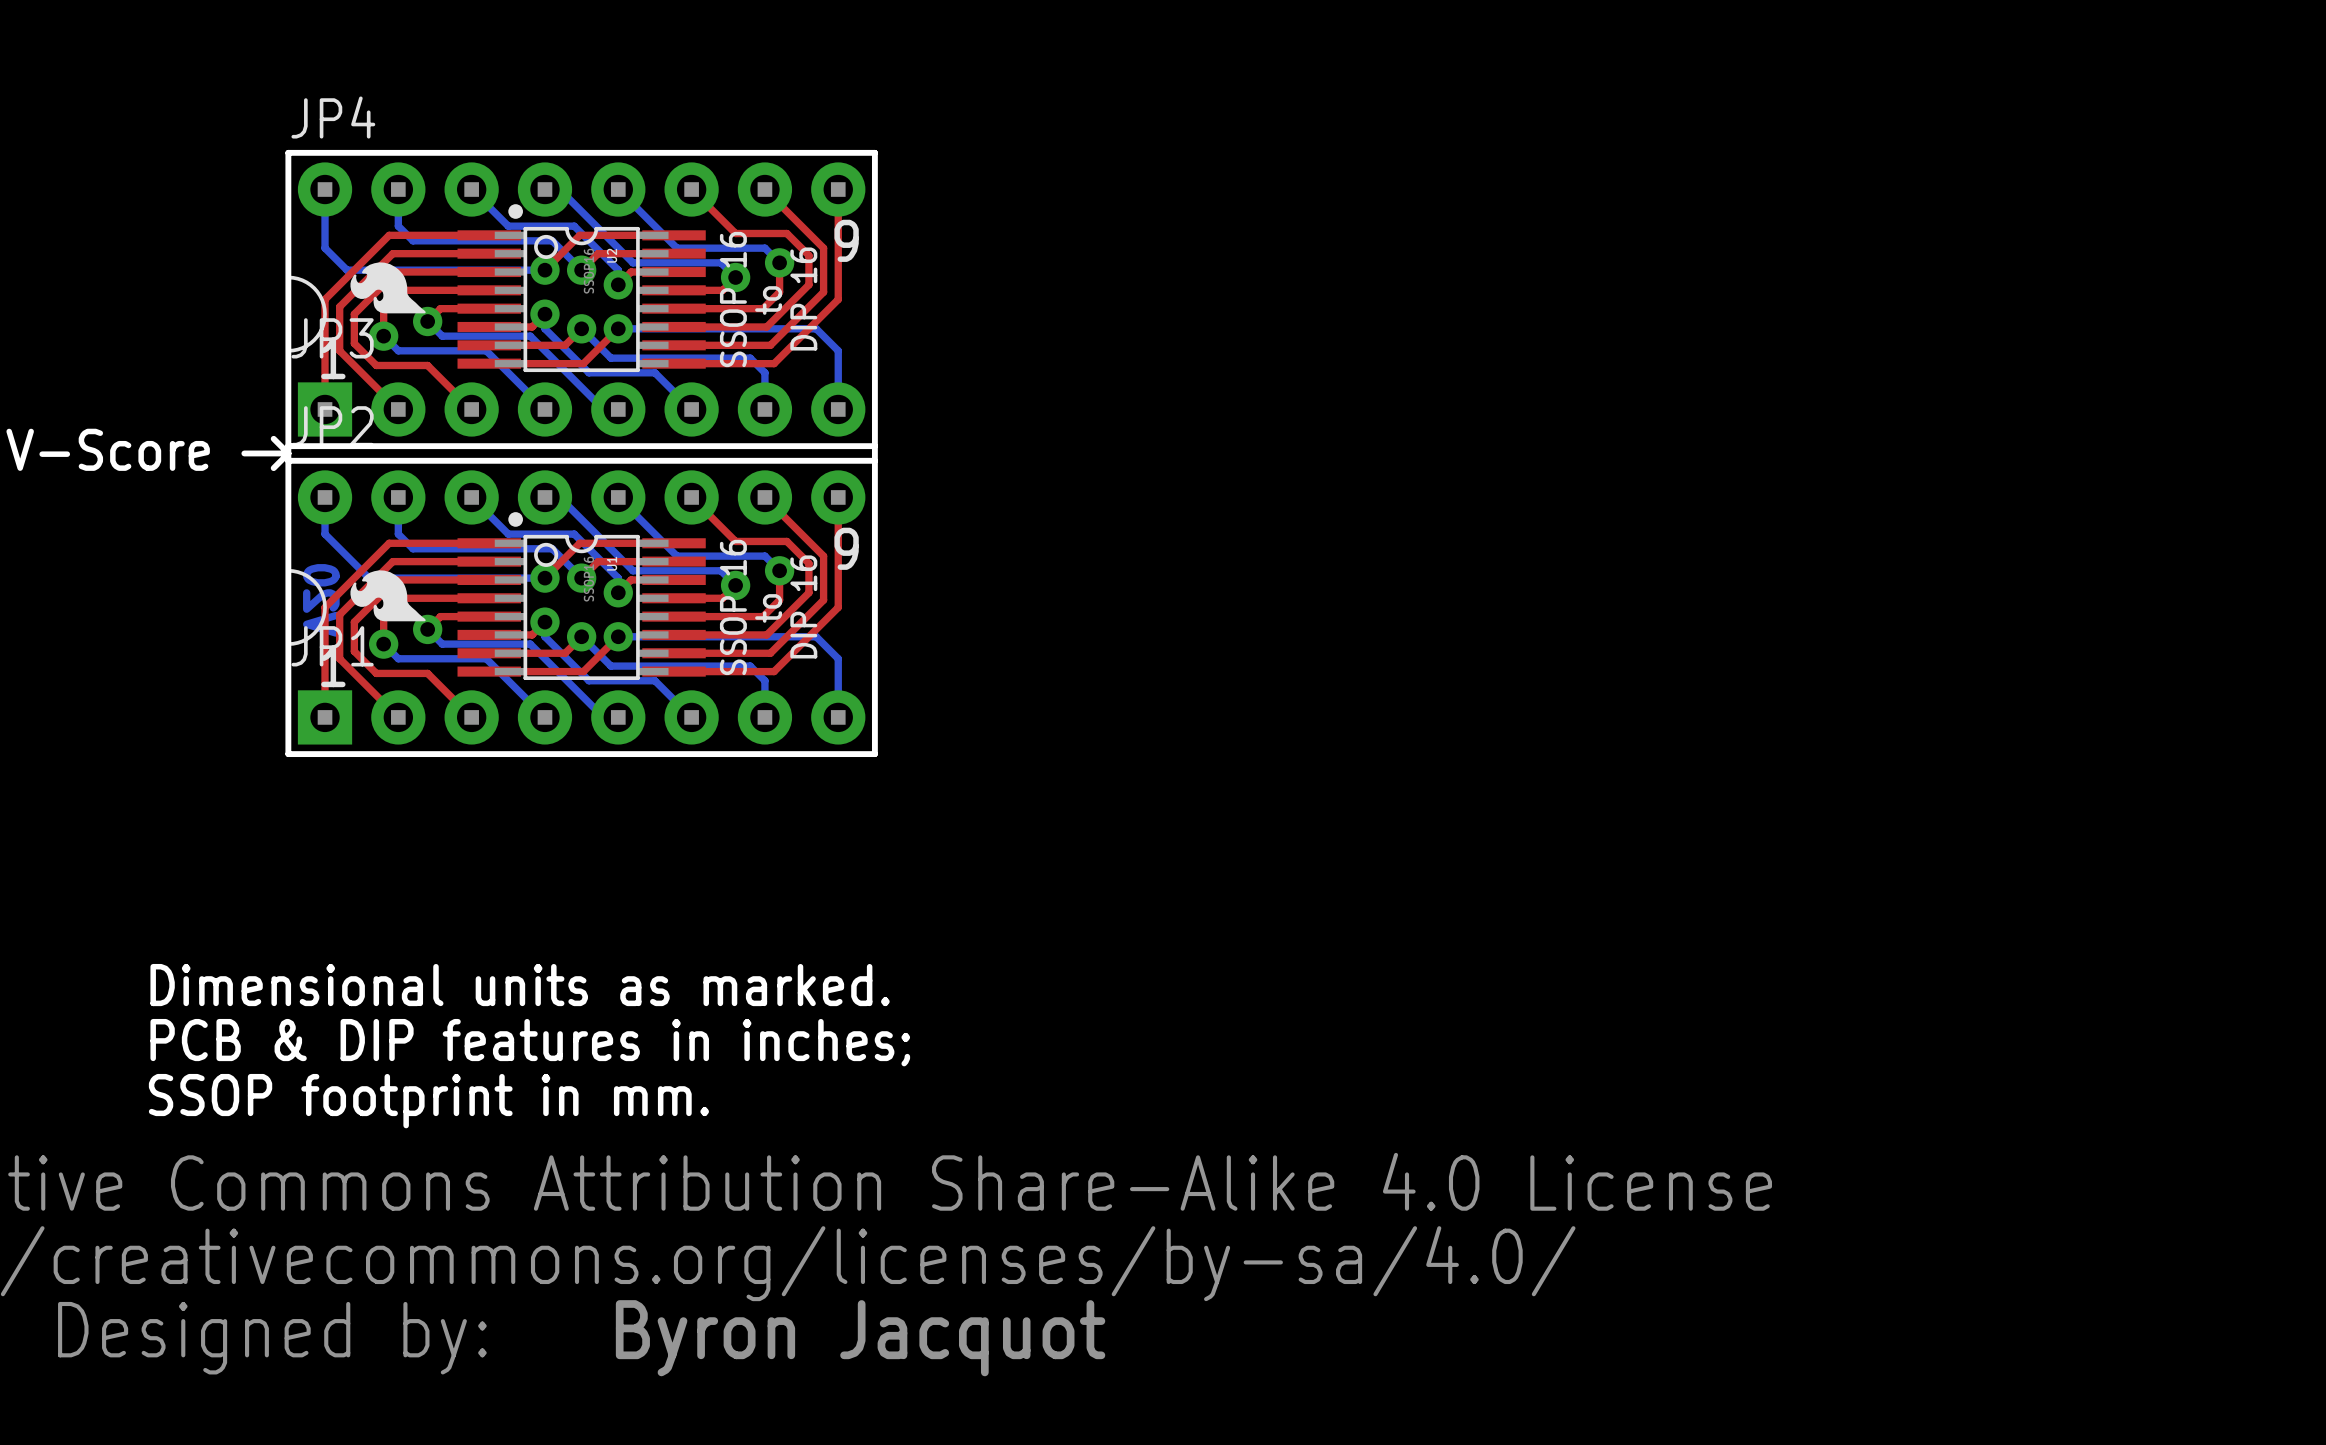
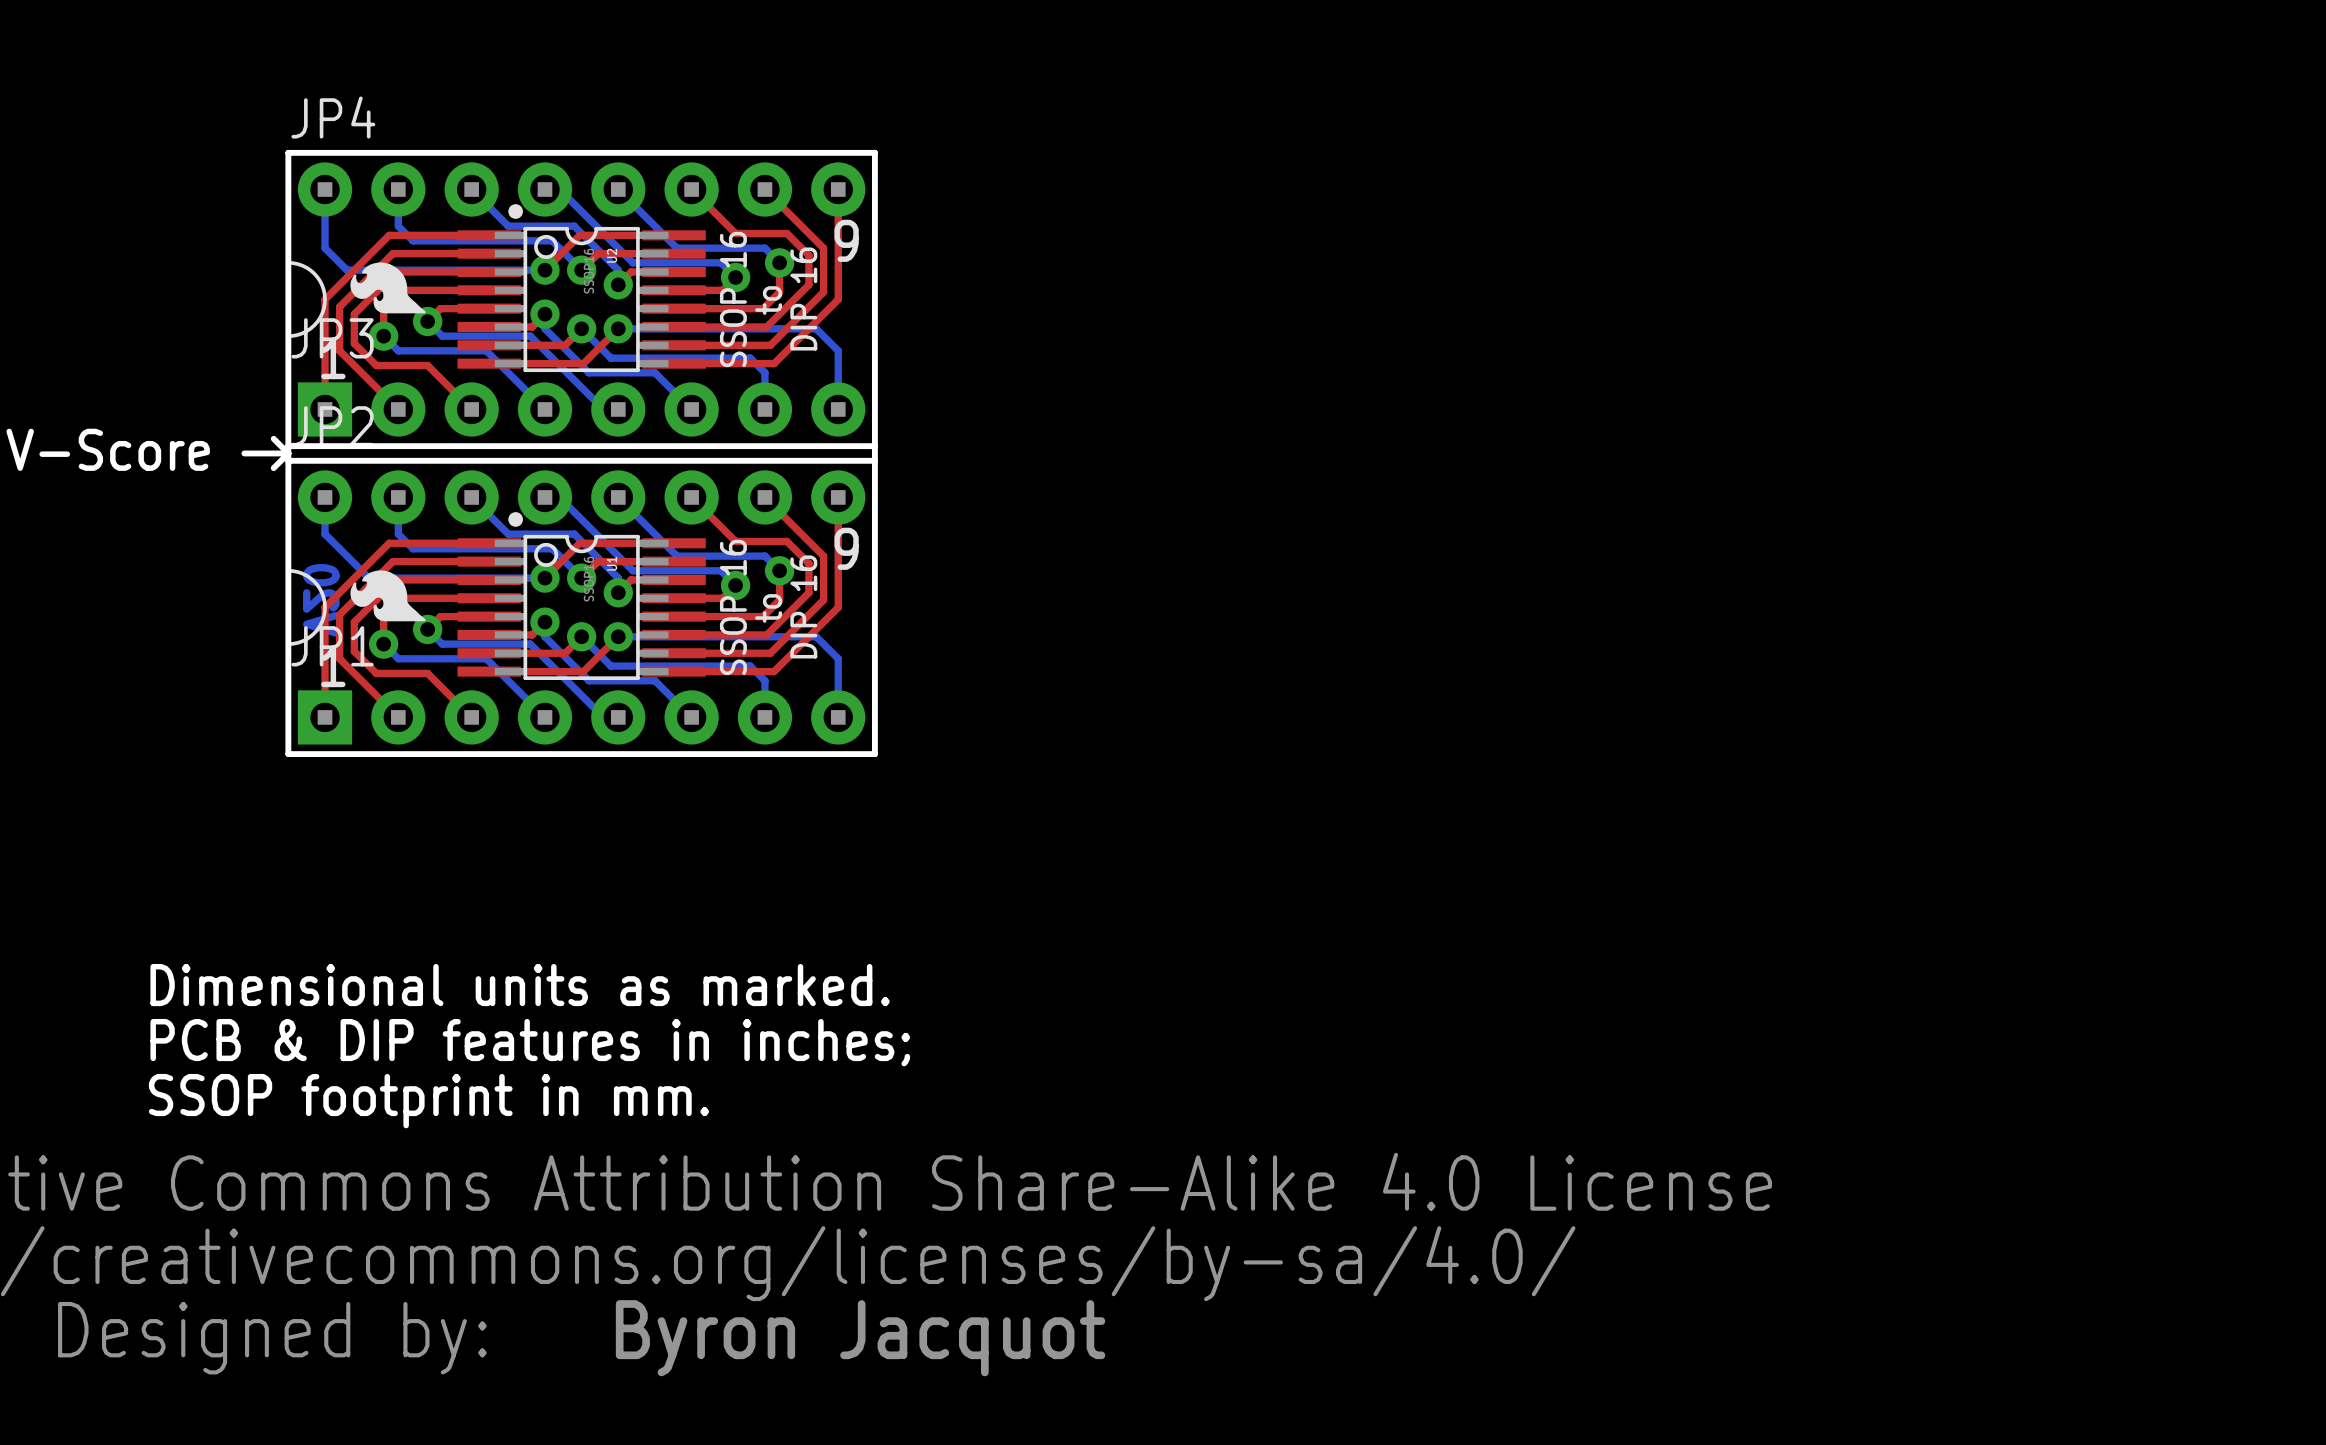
line: (288, 277) (302, 280) (314, 288) (322, 300) (325, 314) (322, 328) (314, 340) (302, 348) (288, 350) -> (288, 262) (302, 265) (314, 273) (322, 285) (325, 299) (322, 313) (314, 325) (302, 333) (288, 336)

